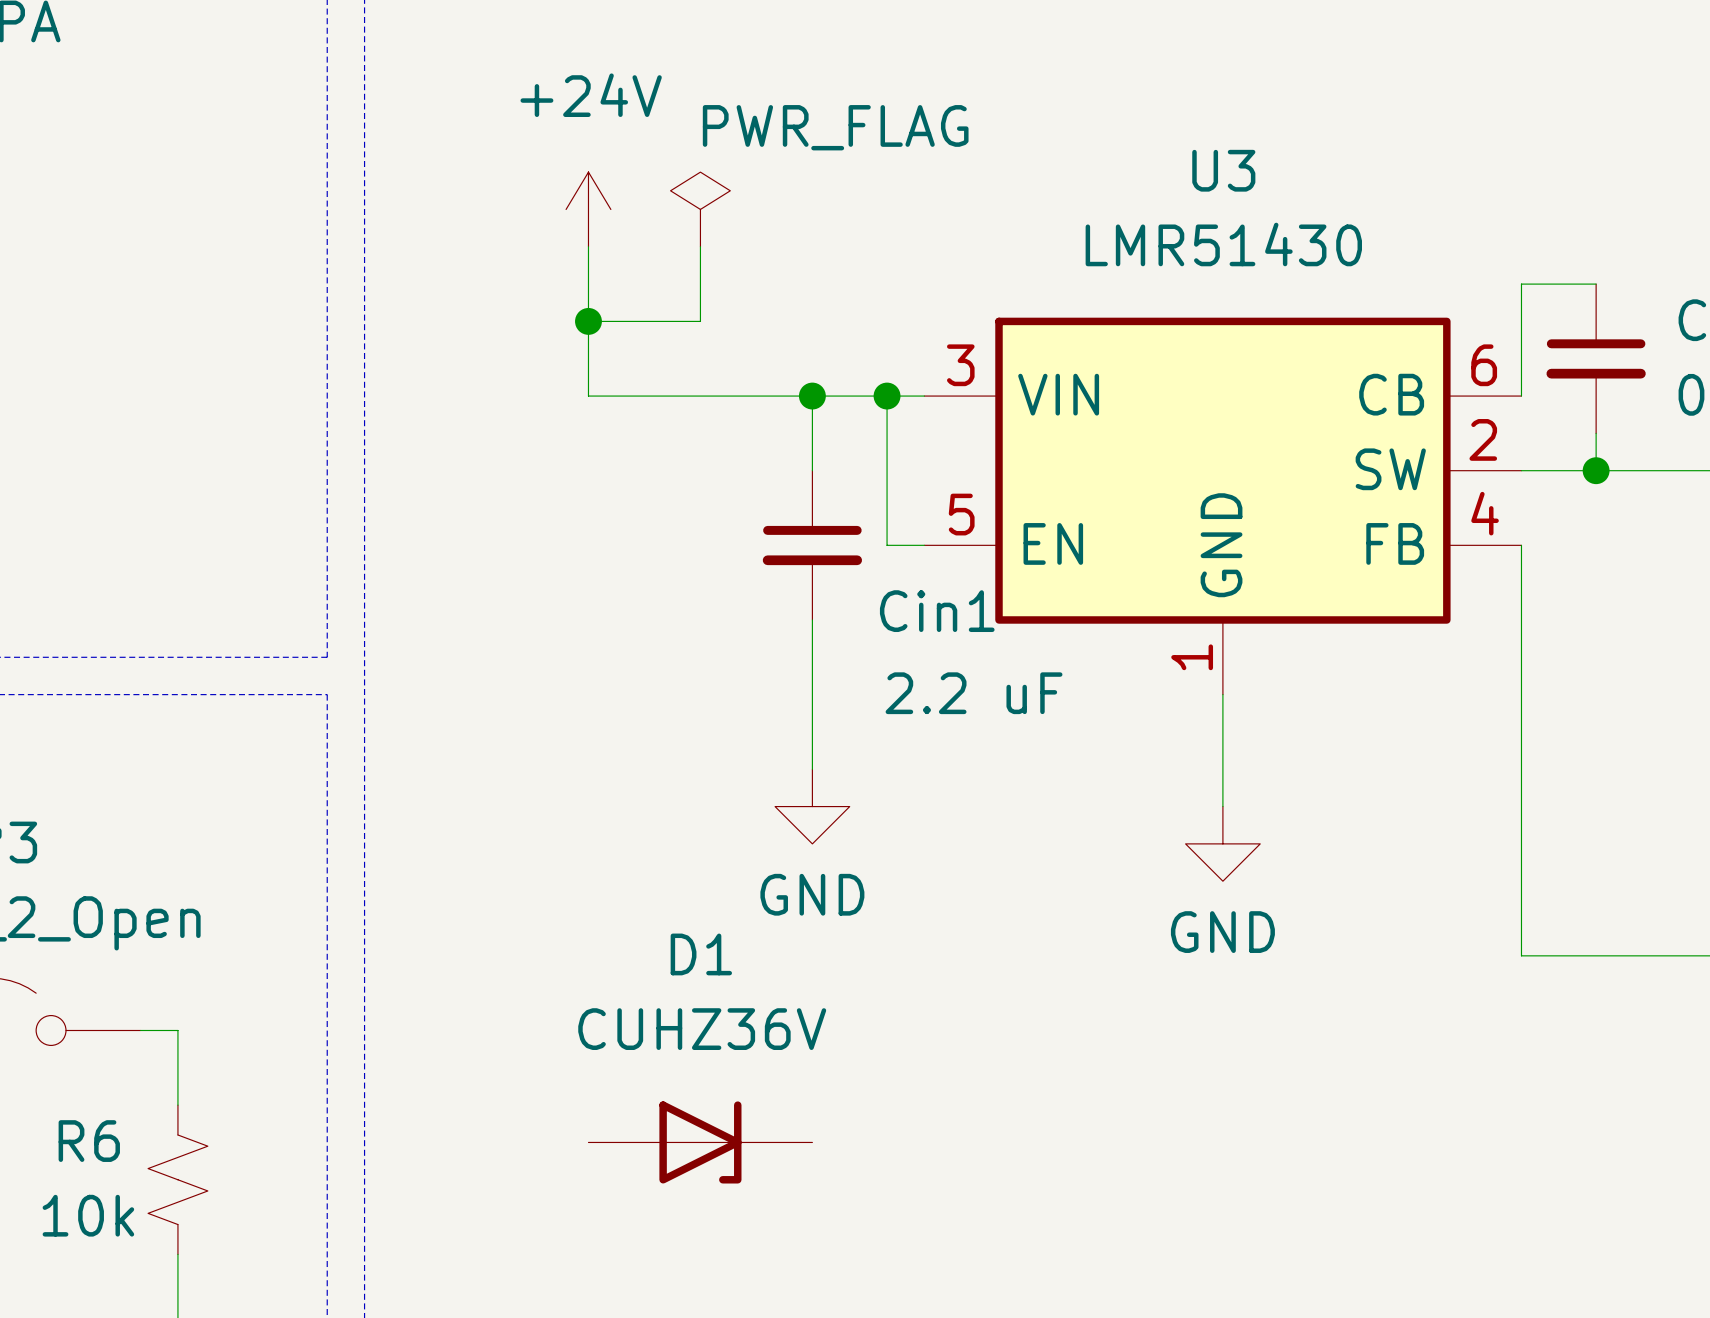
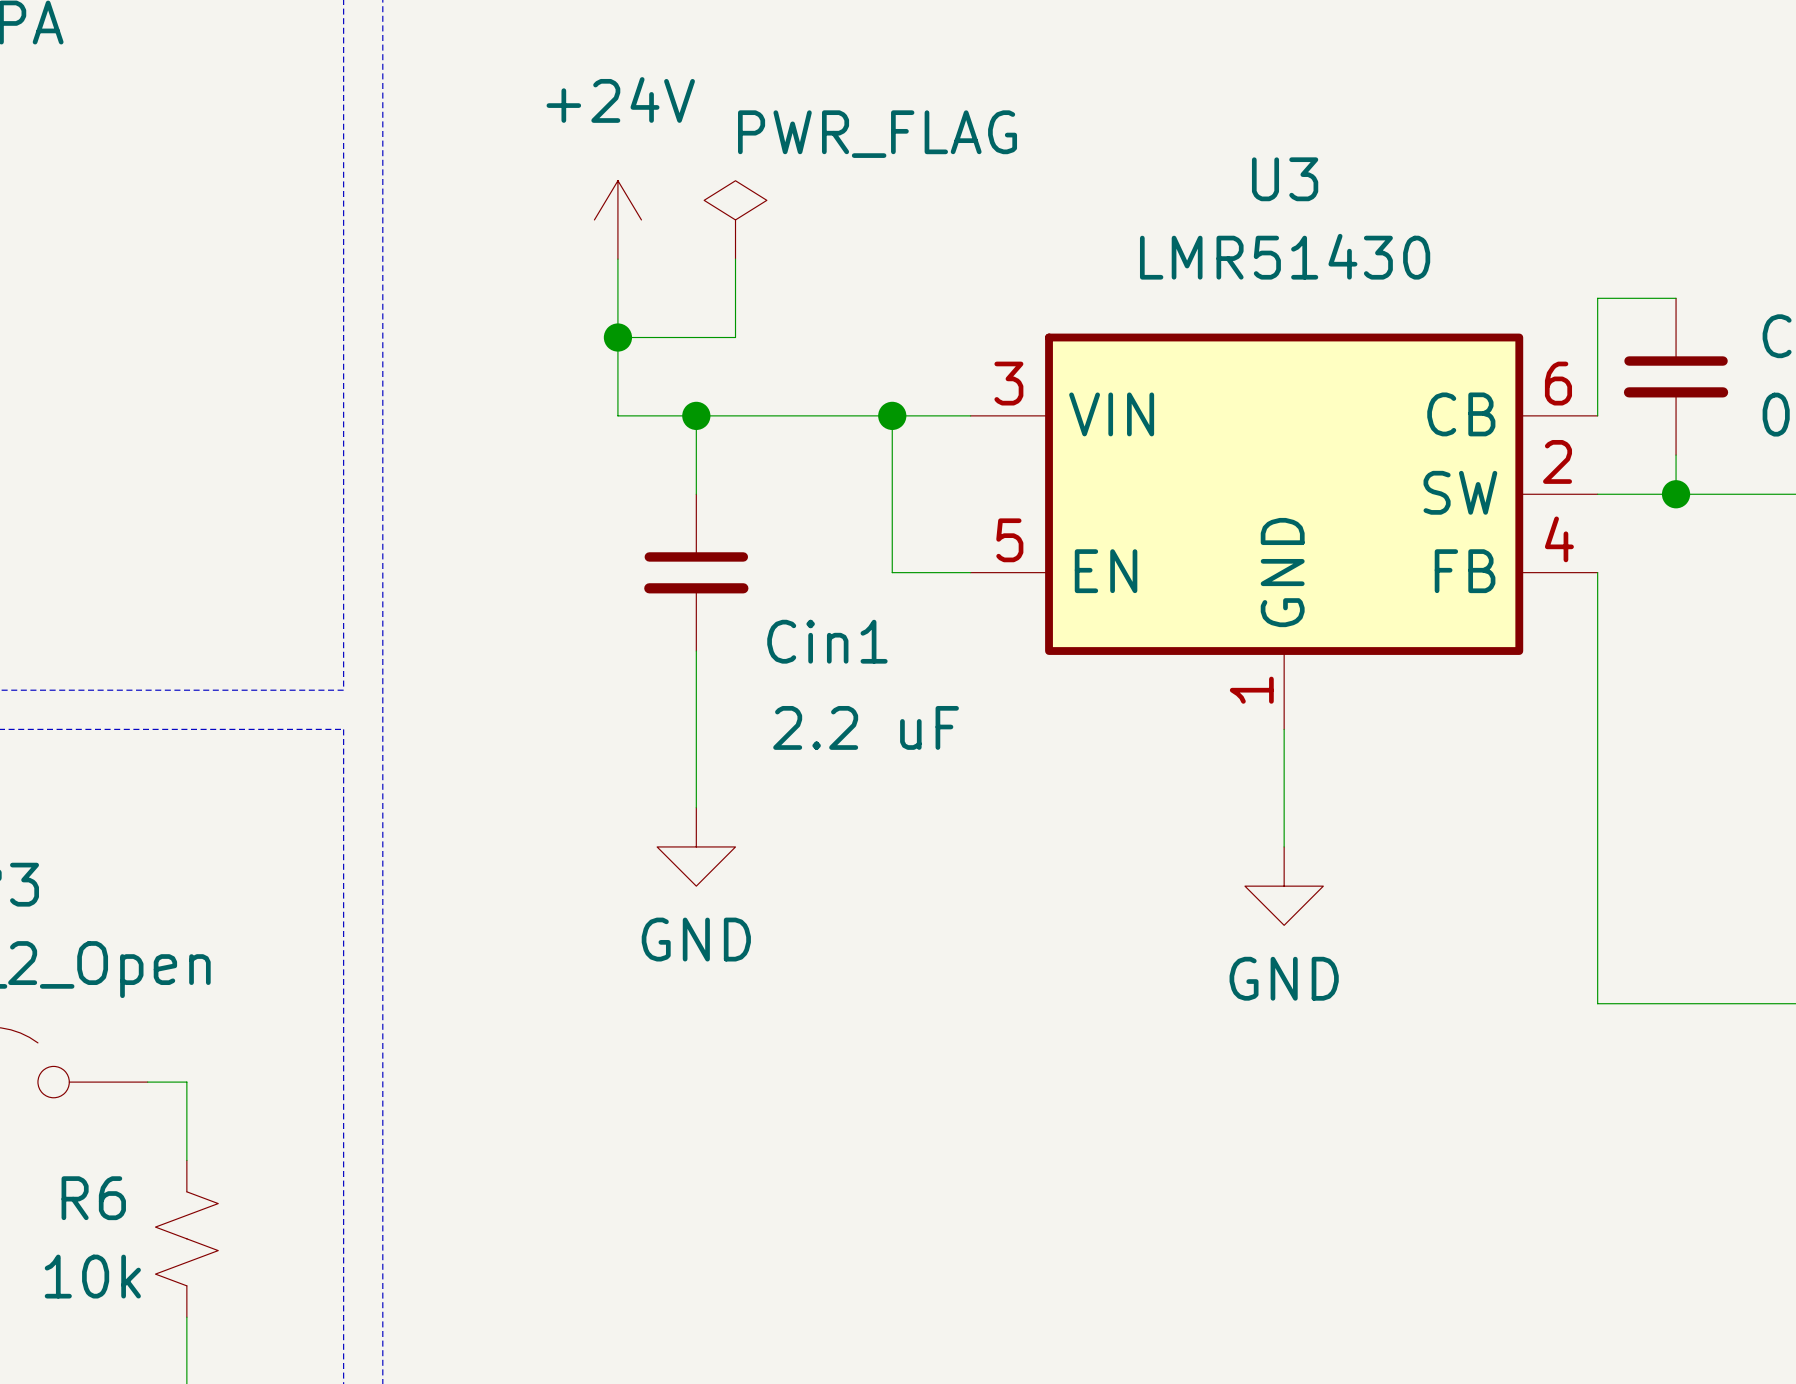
junction: none -> (696, 415)
wire: (812, 396) (812, 470) -> (696, 415) (696, 494)
junction: (812, 396) -> none
junction: none -> (892, 415)
wire: (887, 396) (887, 545) -> (892, 415) (892, 572) (931, 572)
junction: (887, 396) -> none
Cin1 position: (812, 545) -> (696, 572)
wire: (812, 619) (812, 769) -> (696, 651) (696, 807)
power symbol position: GND (812, 806) -> GND (696, 846)
D1: CUHZ36V (700, 1142) -> none

